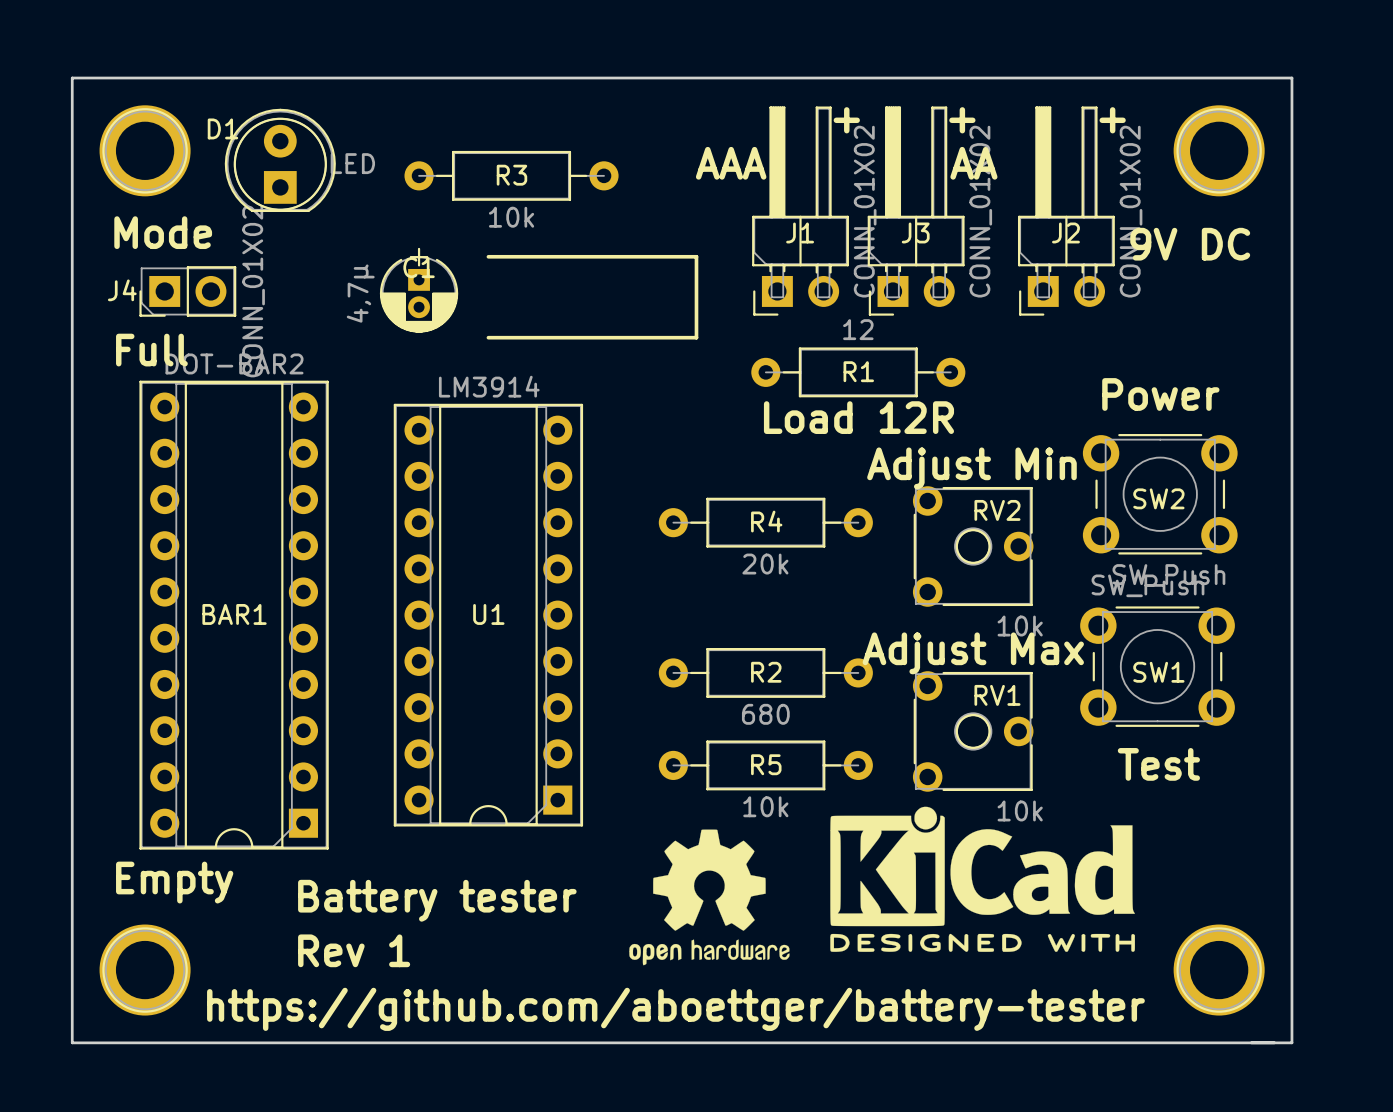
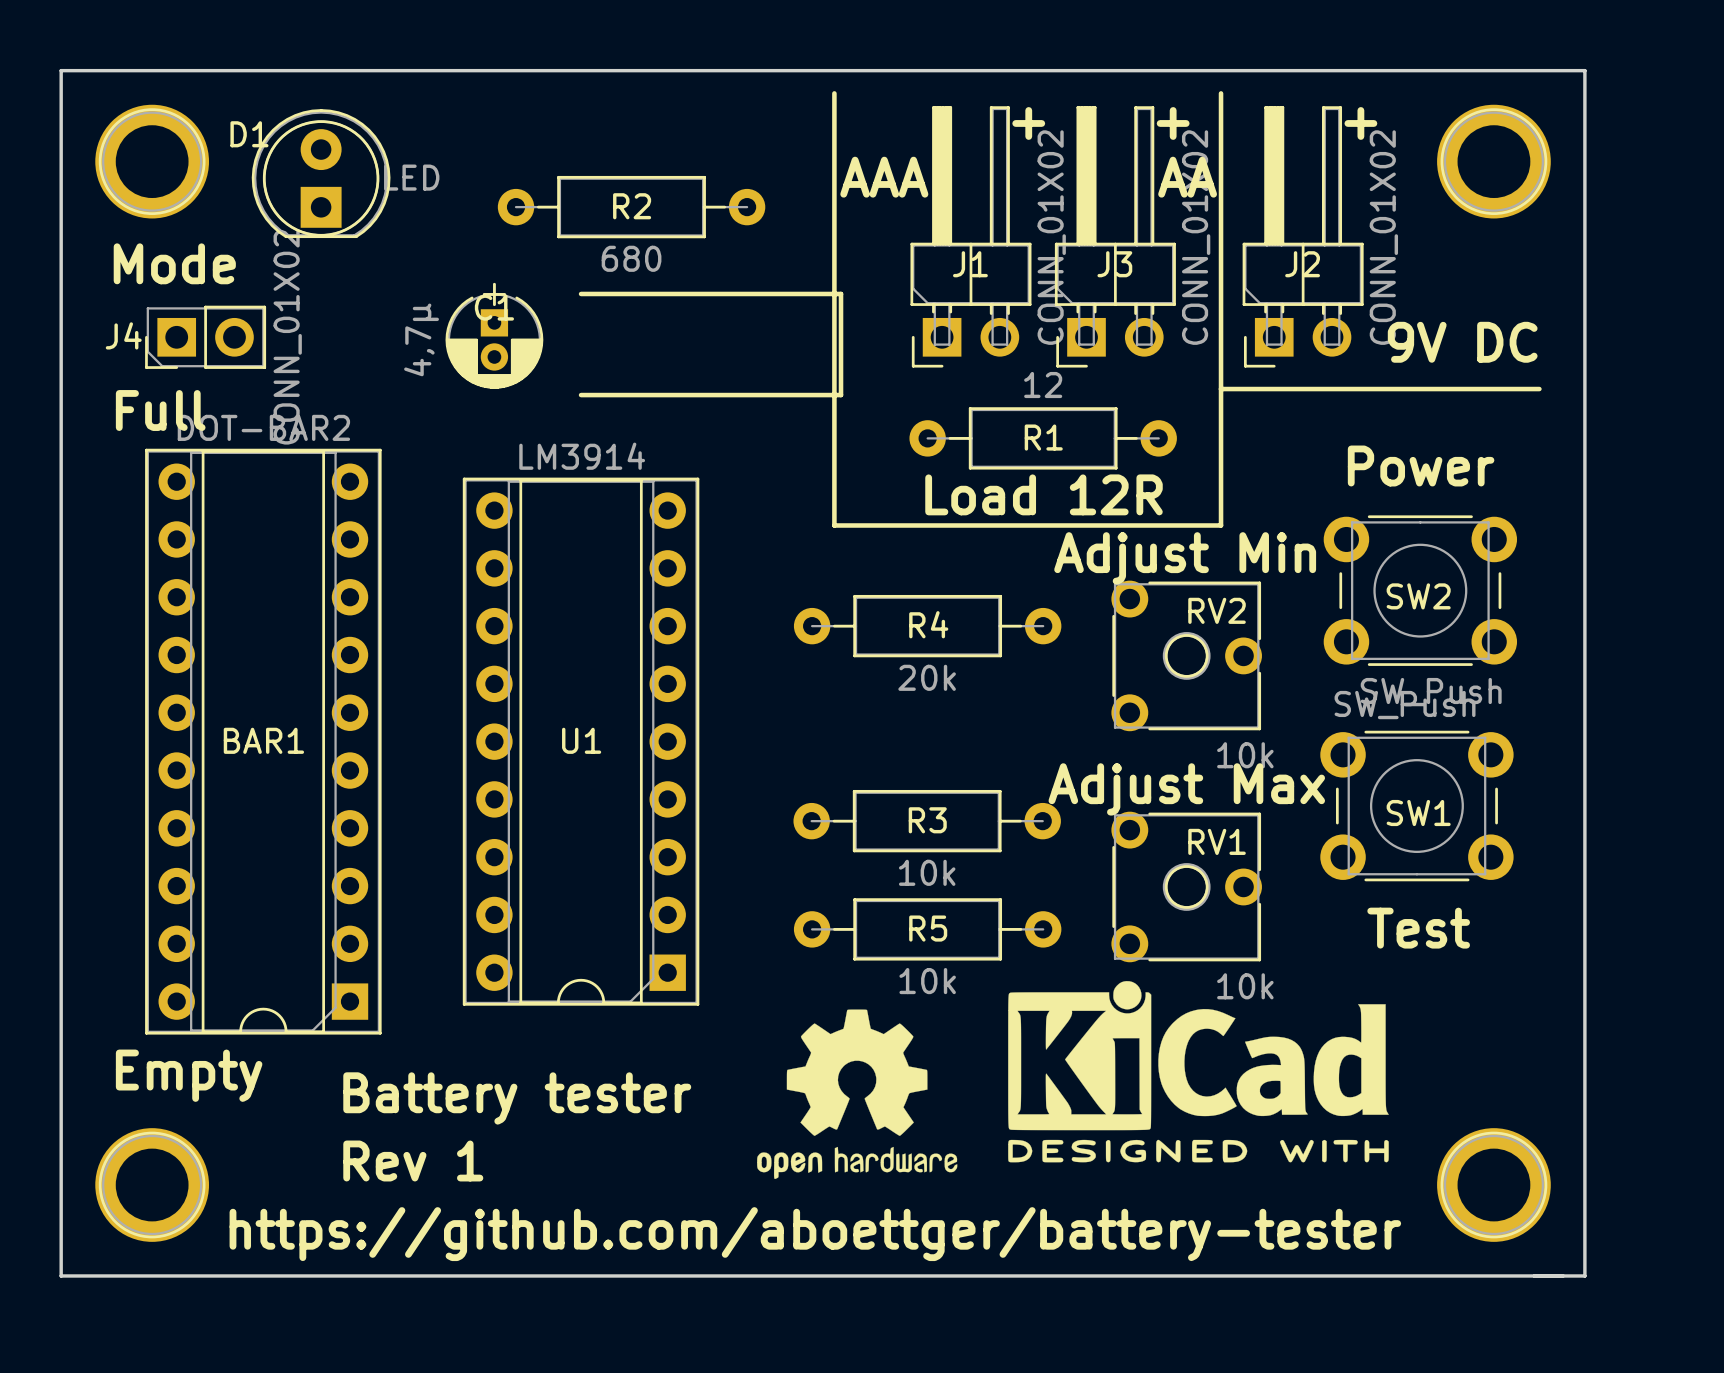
line: none -> (834, 93) (834, 525) (1221, 525) (1221, 93)
R3 position: (511, 175) -> (927, 821)
text position: 9V DC (1190, 244) -> 9V DC (1462, 342)
line: none -> (1221, 389) (1539, 389)
R2 position: (765, 672) -> (631, 207)

